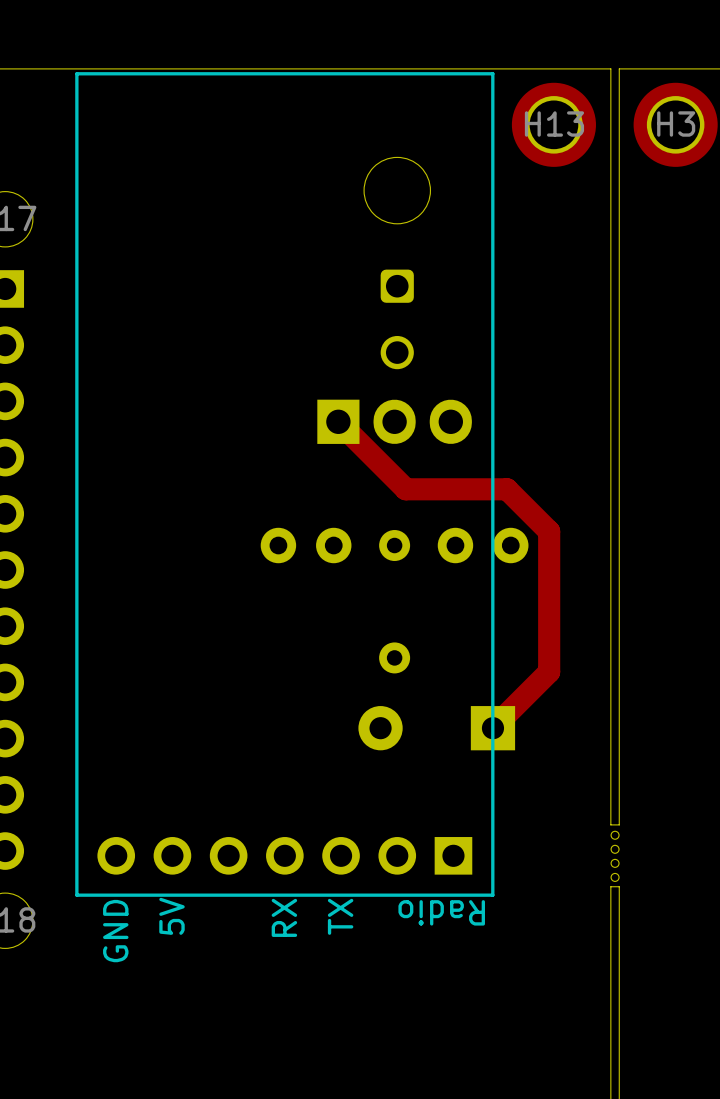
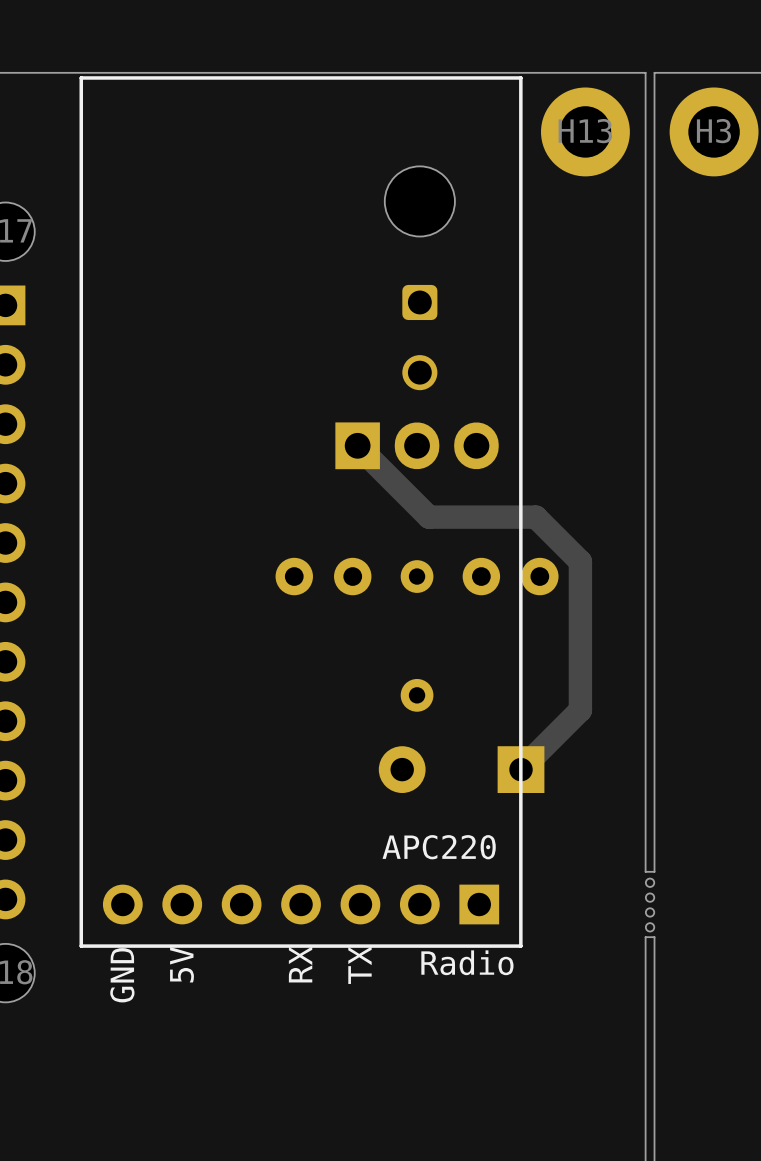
text: none -> APC220 (439, 847)
text rotation: 0° (441, 912) -> 180° (467, 962)

